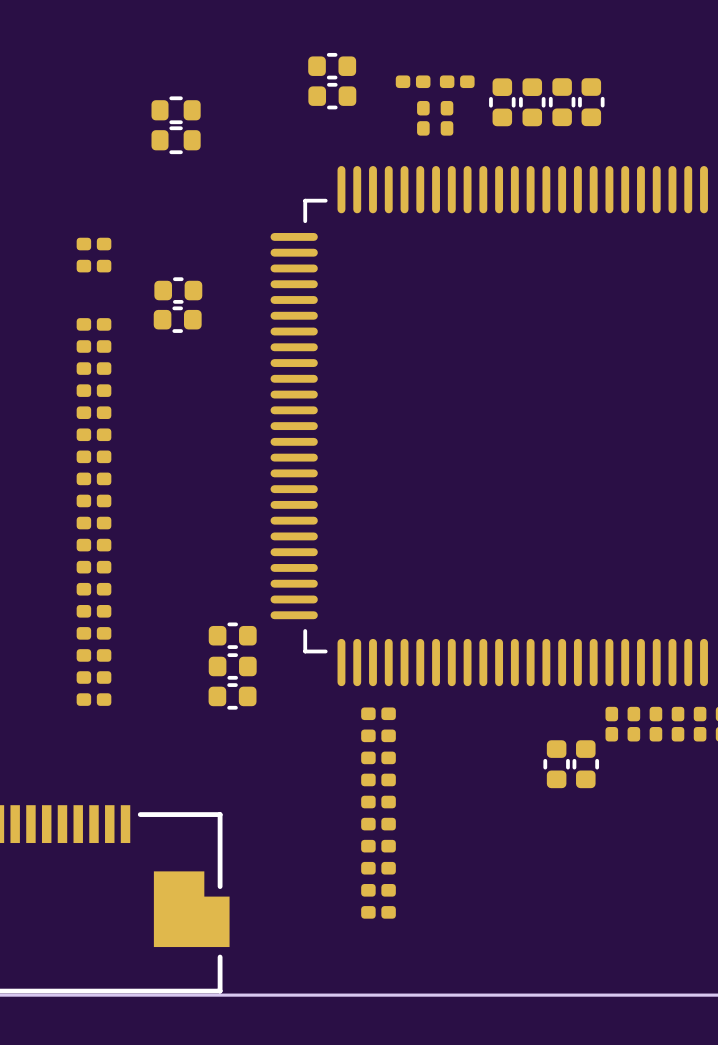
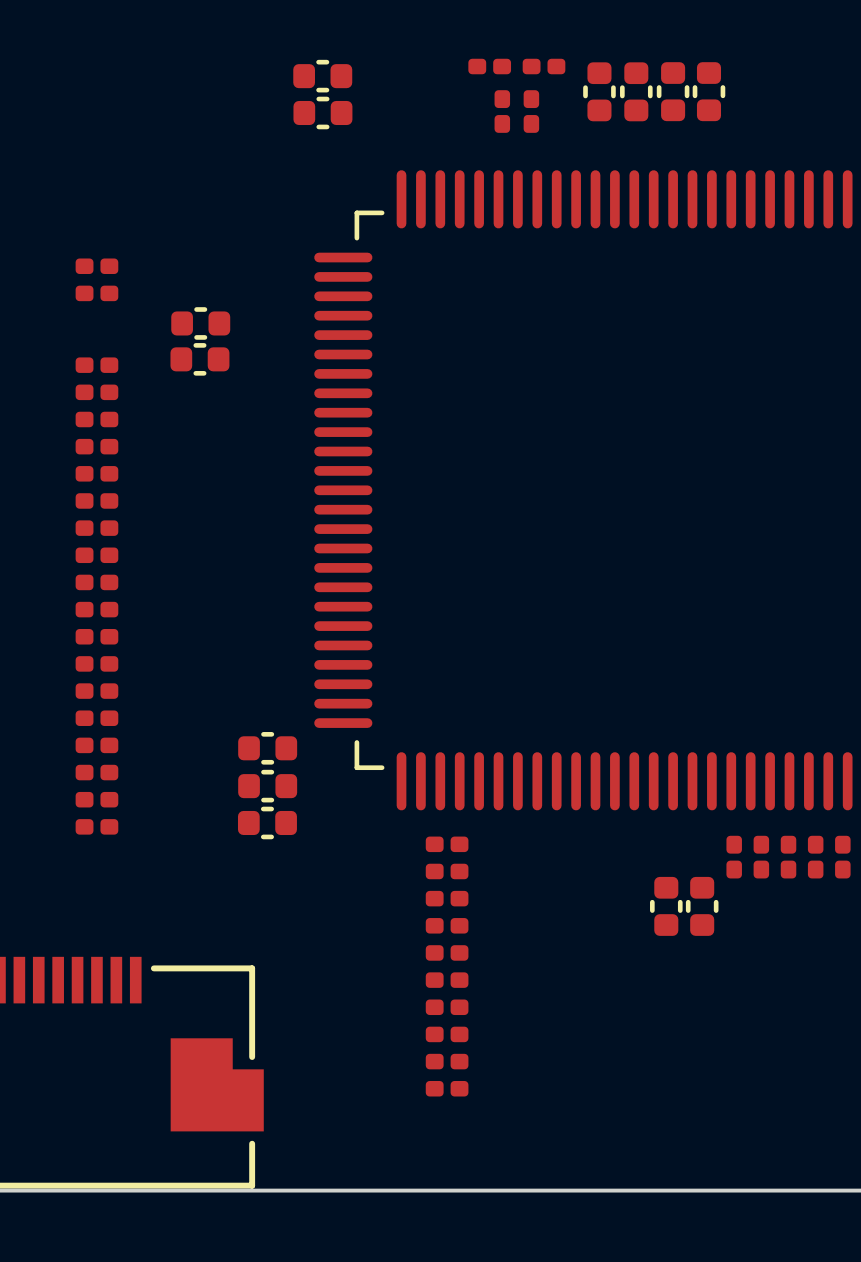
part: (332, 66) -> none
part: none -> (322, 76)
part: (332, 96) -> none
part: (176, 110) -> none
part: none -> (322, 112)
part: (176, 140) -> none

